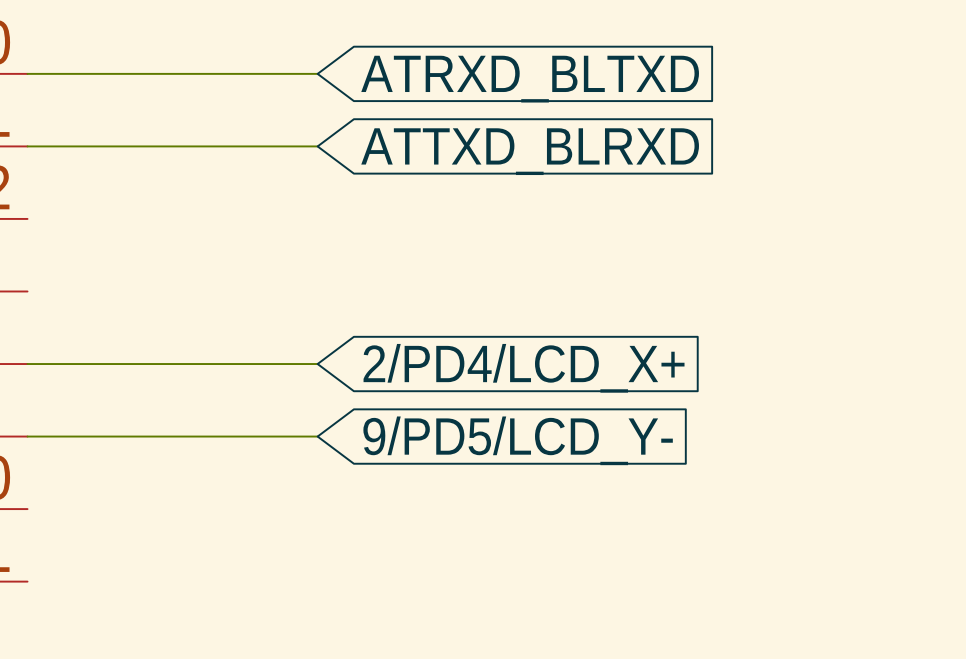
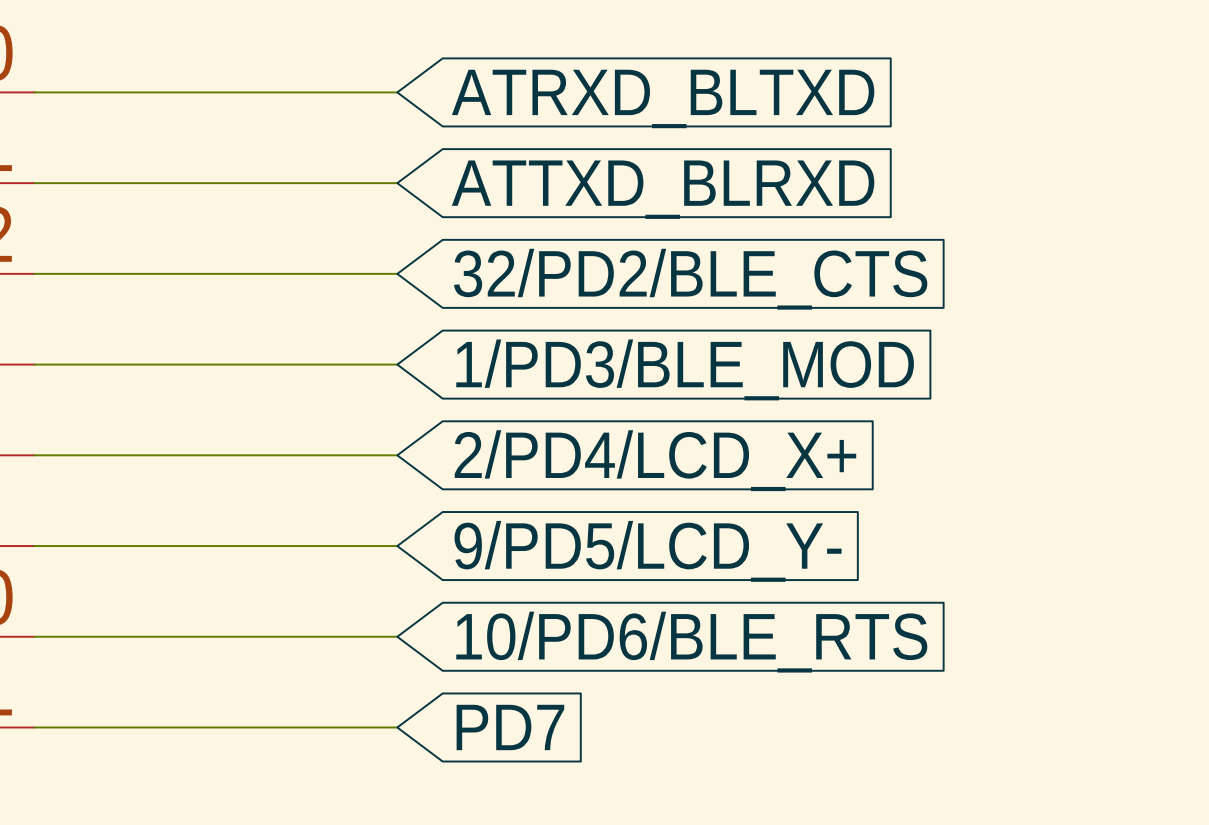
wire: none -> (34, 273) (397, 273)
global label: none -> 32/PD2/BLE_CTS (690, 279)
wire: none -> (34, 364) (397, 364)
global label: none -> 1/PD3/BLE_MOD (685, 369)
wire: none -> (34, 636) (397, 636)
global label: none -> 10/PD6/BLE_RTS (691, 642)
wire: none -> (34, 727) (397, 727)
global label: none -> PD7 (510, 727)

